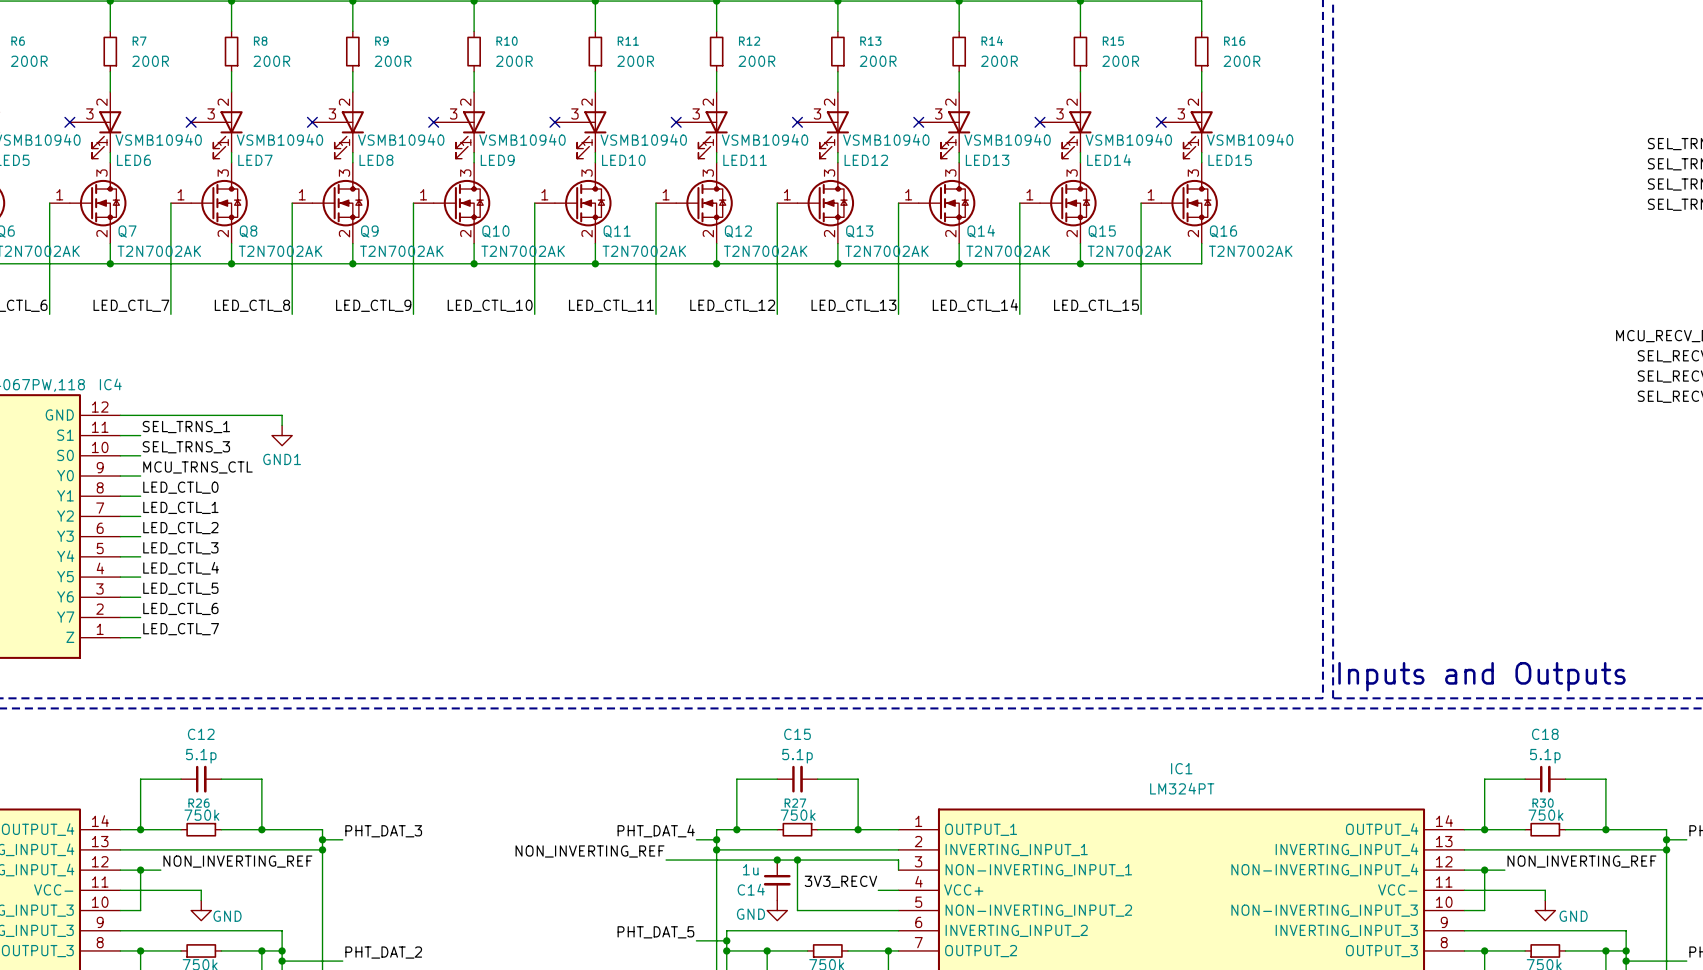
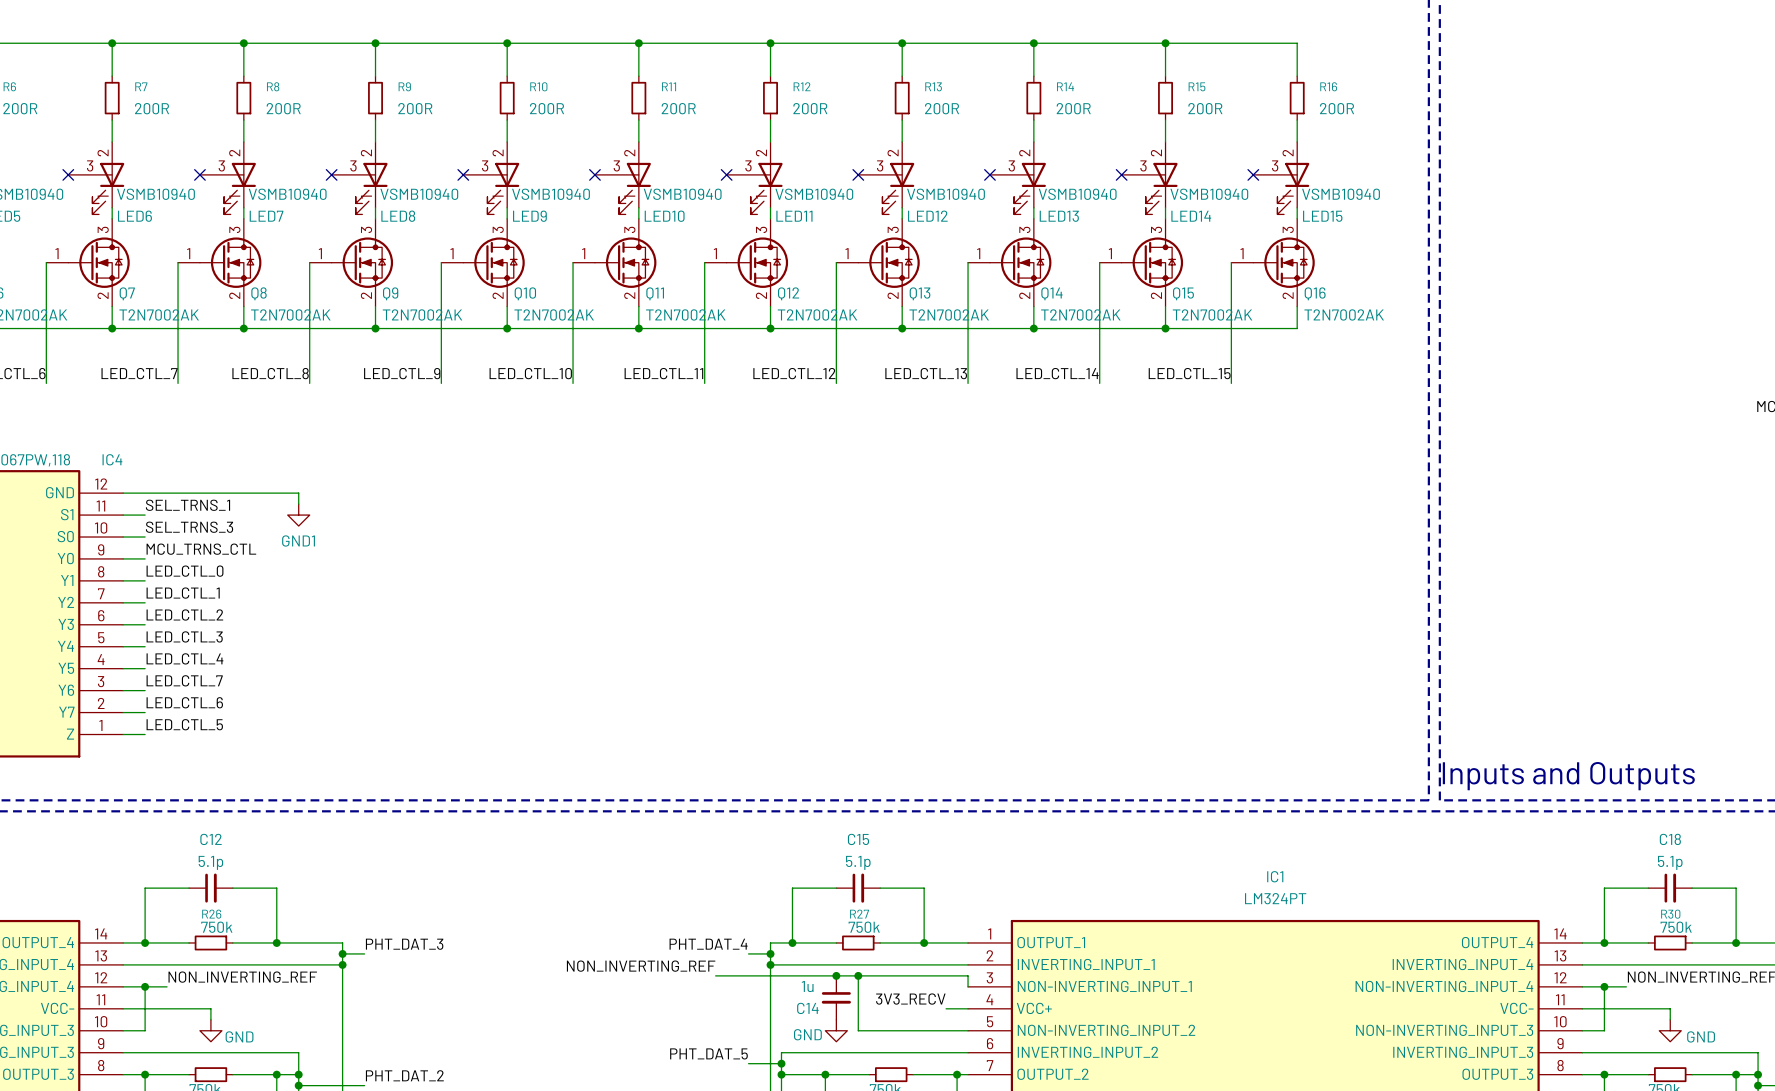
label: LED_CTL_5 (180, 588) -> LED_CTL_7 (184, 680)
label: LED_CTL_7 (181, 629) -> LED_CTL_5 (184, 724)

